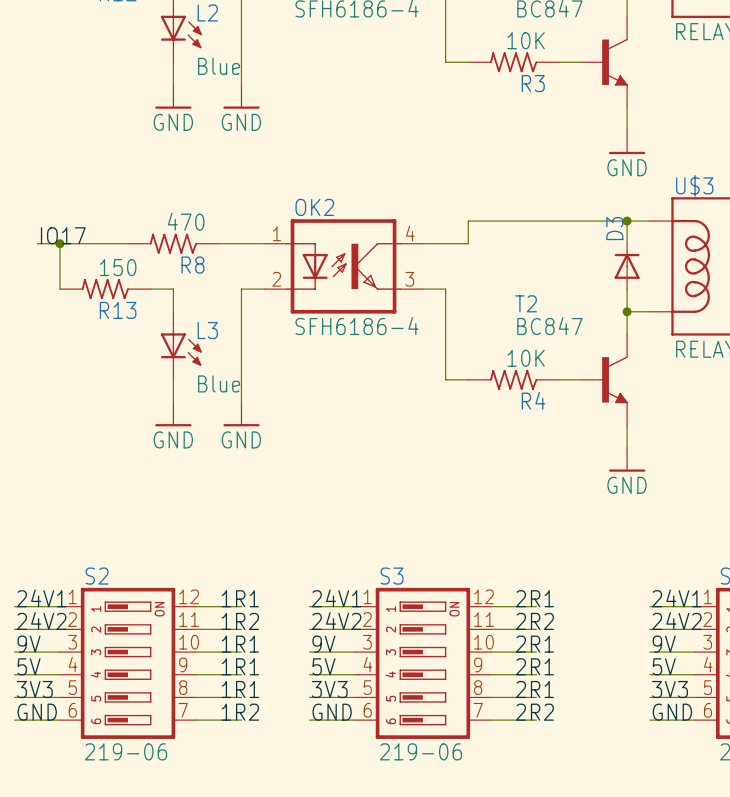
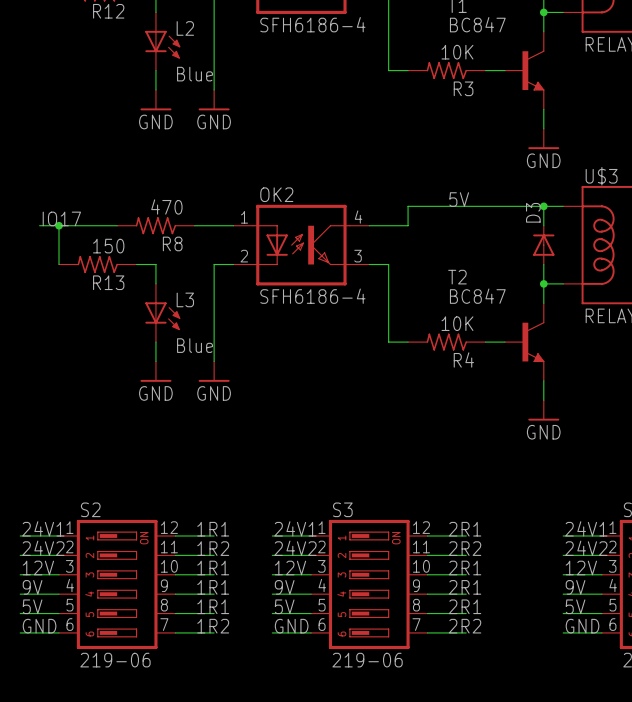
label: none -> 5V (459, 199)
label: 9V (29, 644) -> 12V (38, 567)
label: 9V (323, 644) -> 12V (290, 567)
label: 9V (664, 644) -> 12V (581, 567)
label: 5V (29, 666) -> 9V (32, 587)
label: 5V (323, 666) -> 9V (284, 587)
label: 5V (664, 666) -> 9V (575, 587)
label: 3V3 (34, 689) -> 5V (32, 606)
label: 3V3 (329, 689) -> 5V (284, 606)
label: 3V3 (670, 689) -> 5V (575, 606)

